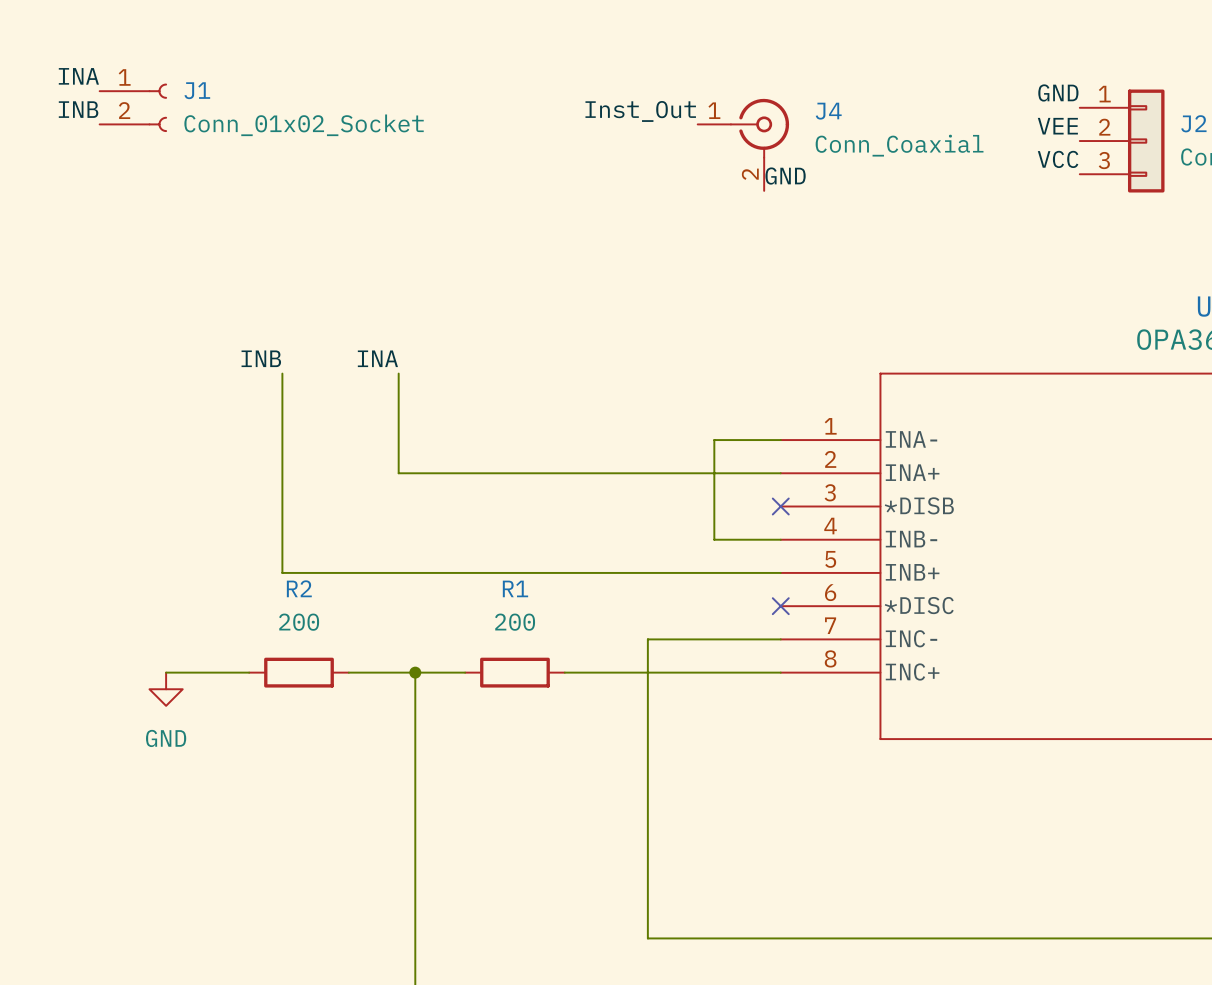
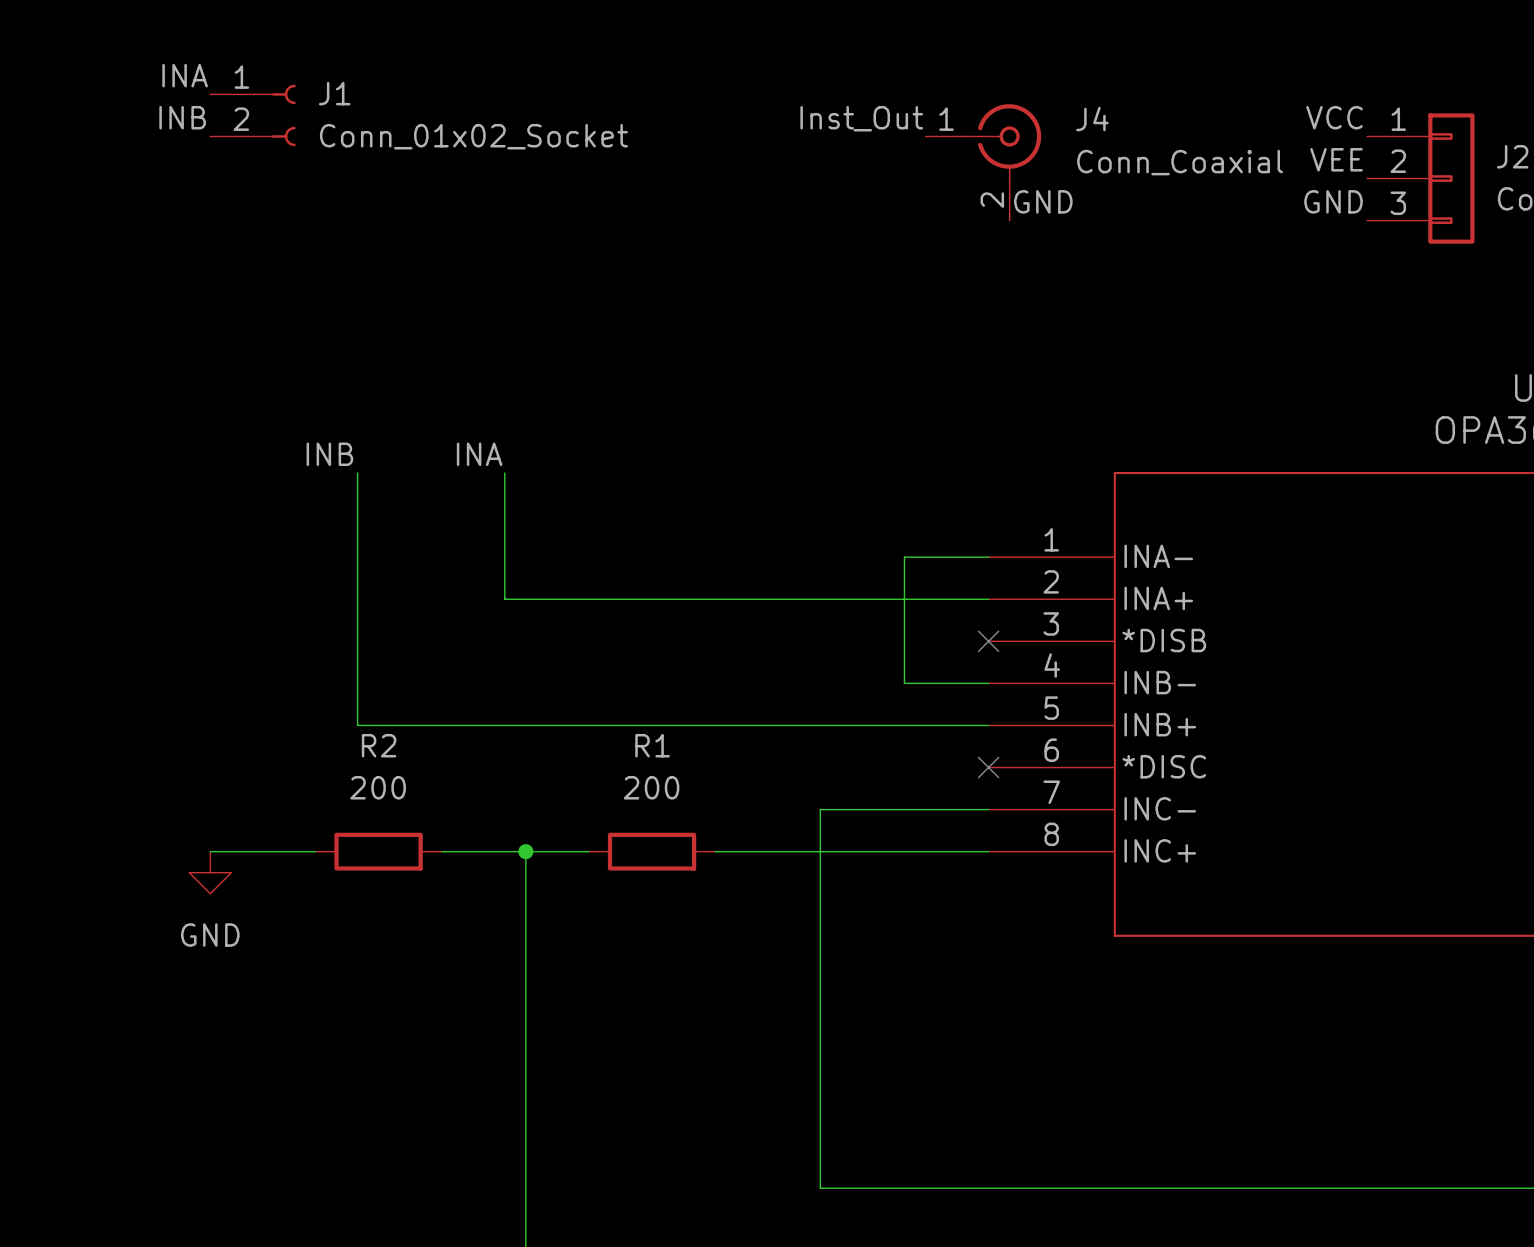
label position: INA (78, 76) -> INA (185, 75)
label: GND (1058, 92) -> VCC (1334, 117)
J1 position: (133, 107) -> (253, 115)
label position: INB (78, 109) -> INB (182, 117)
label position: Inst_Out (640, 111) -> Inst_Out (861, 118)
J4 position: (743, 144) -> (983, 162)
label: VCC (1058, 159) -> GND (1333, 201)
label position: GND (785, 176) -> GND (1043, 201)

